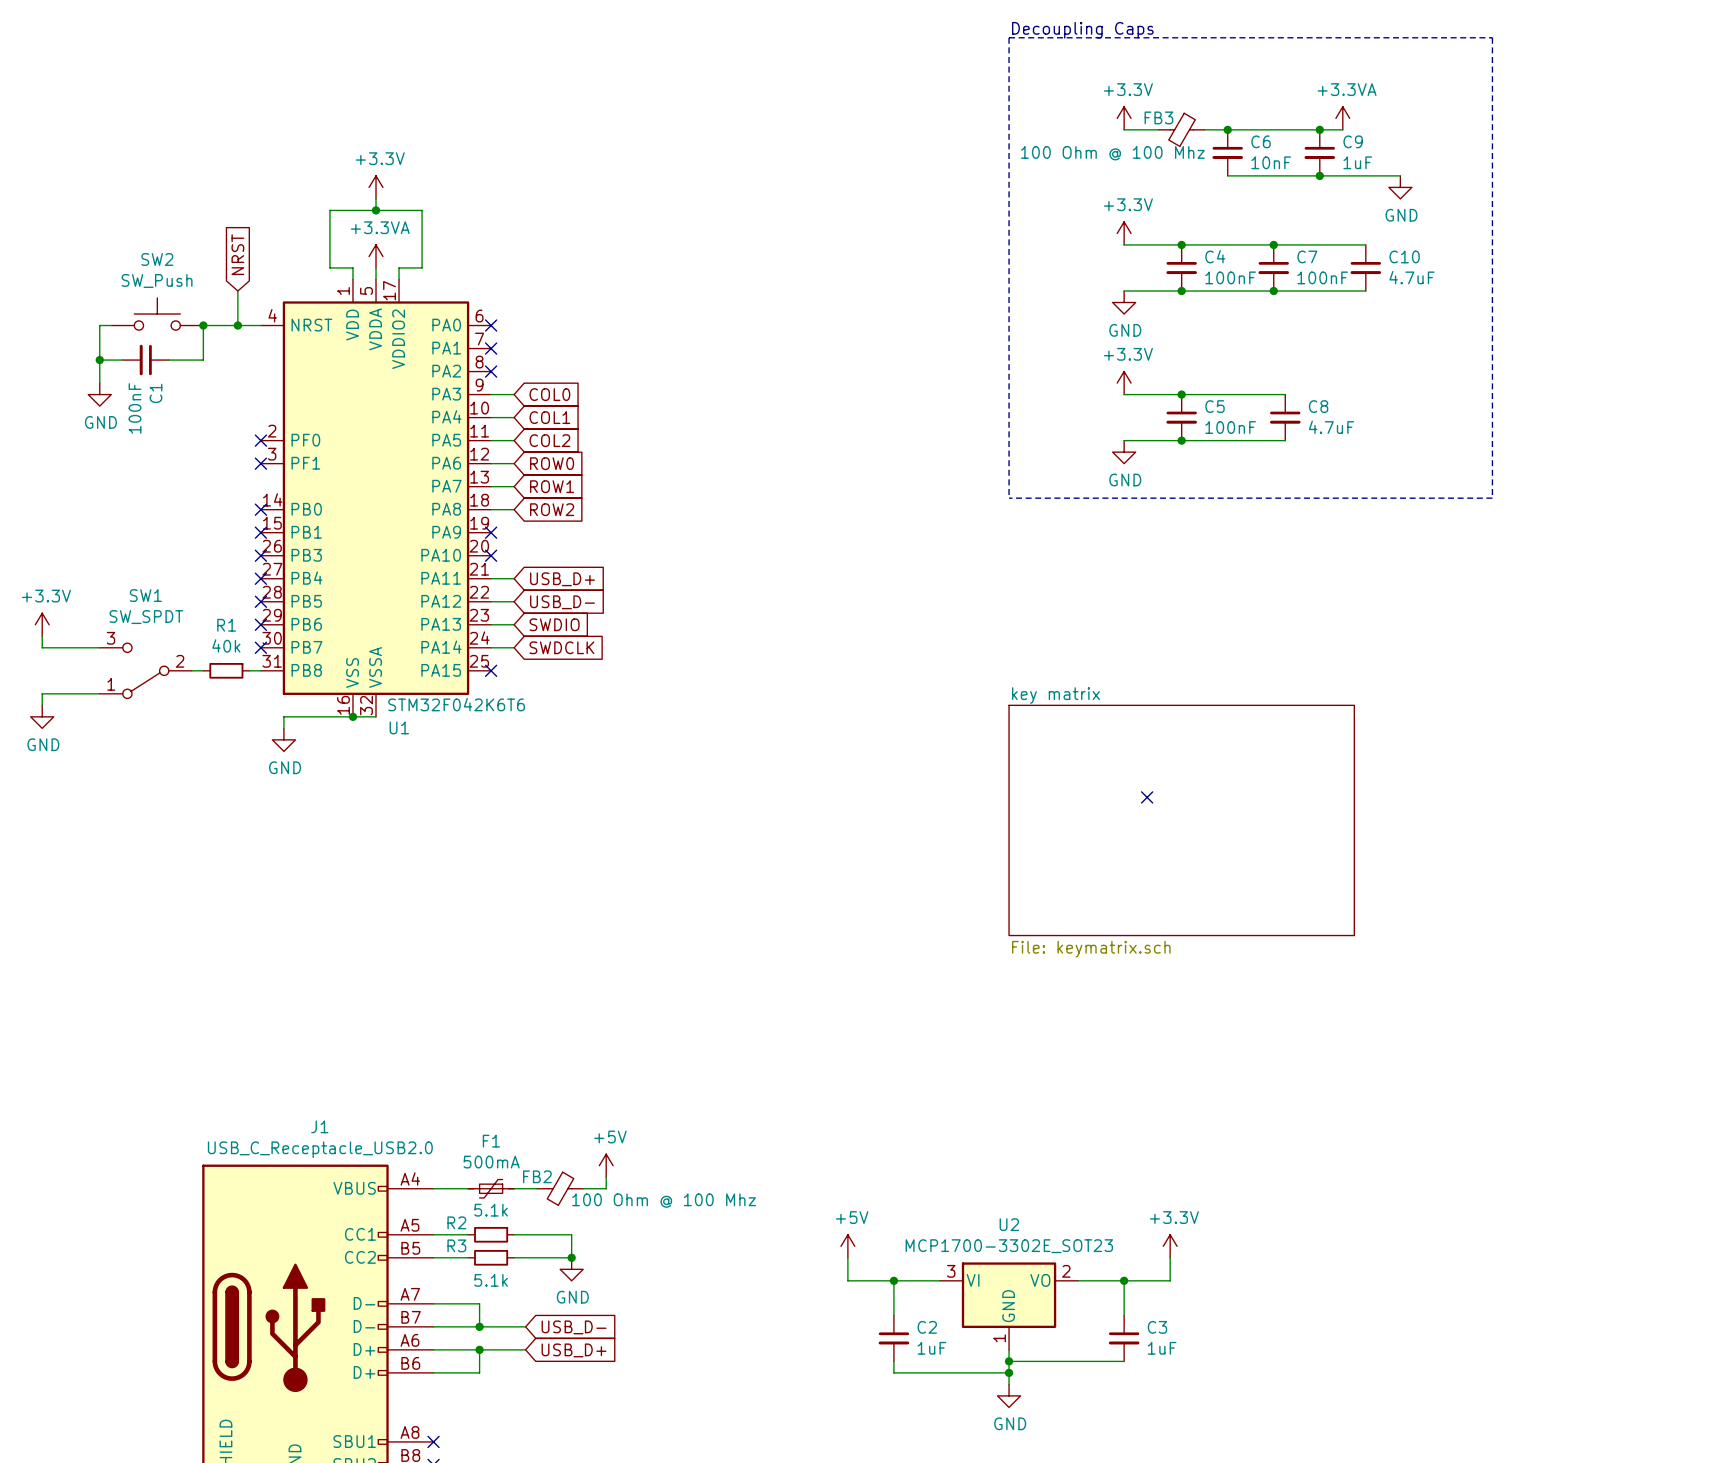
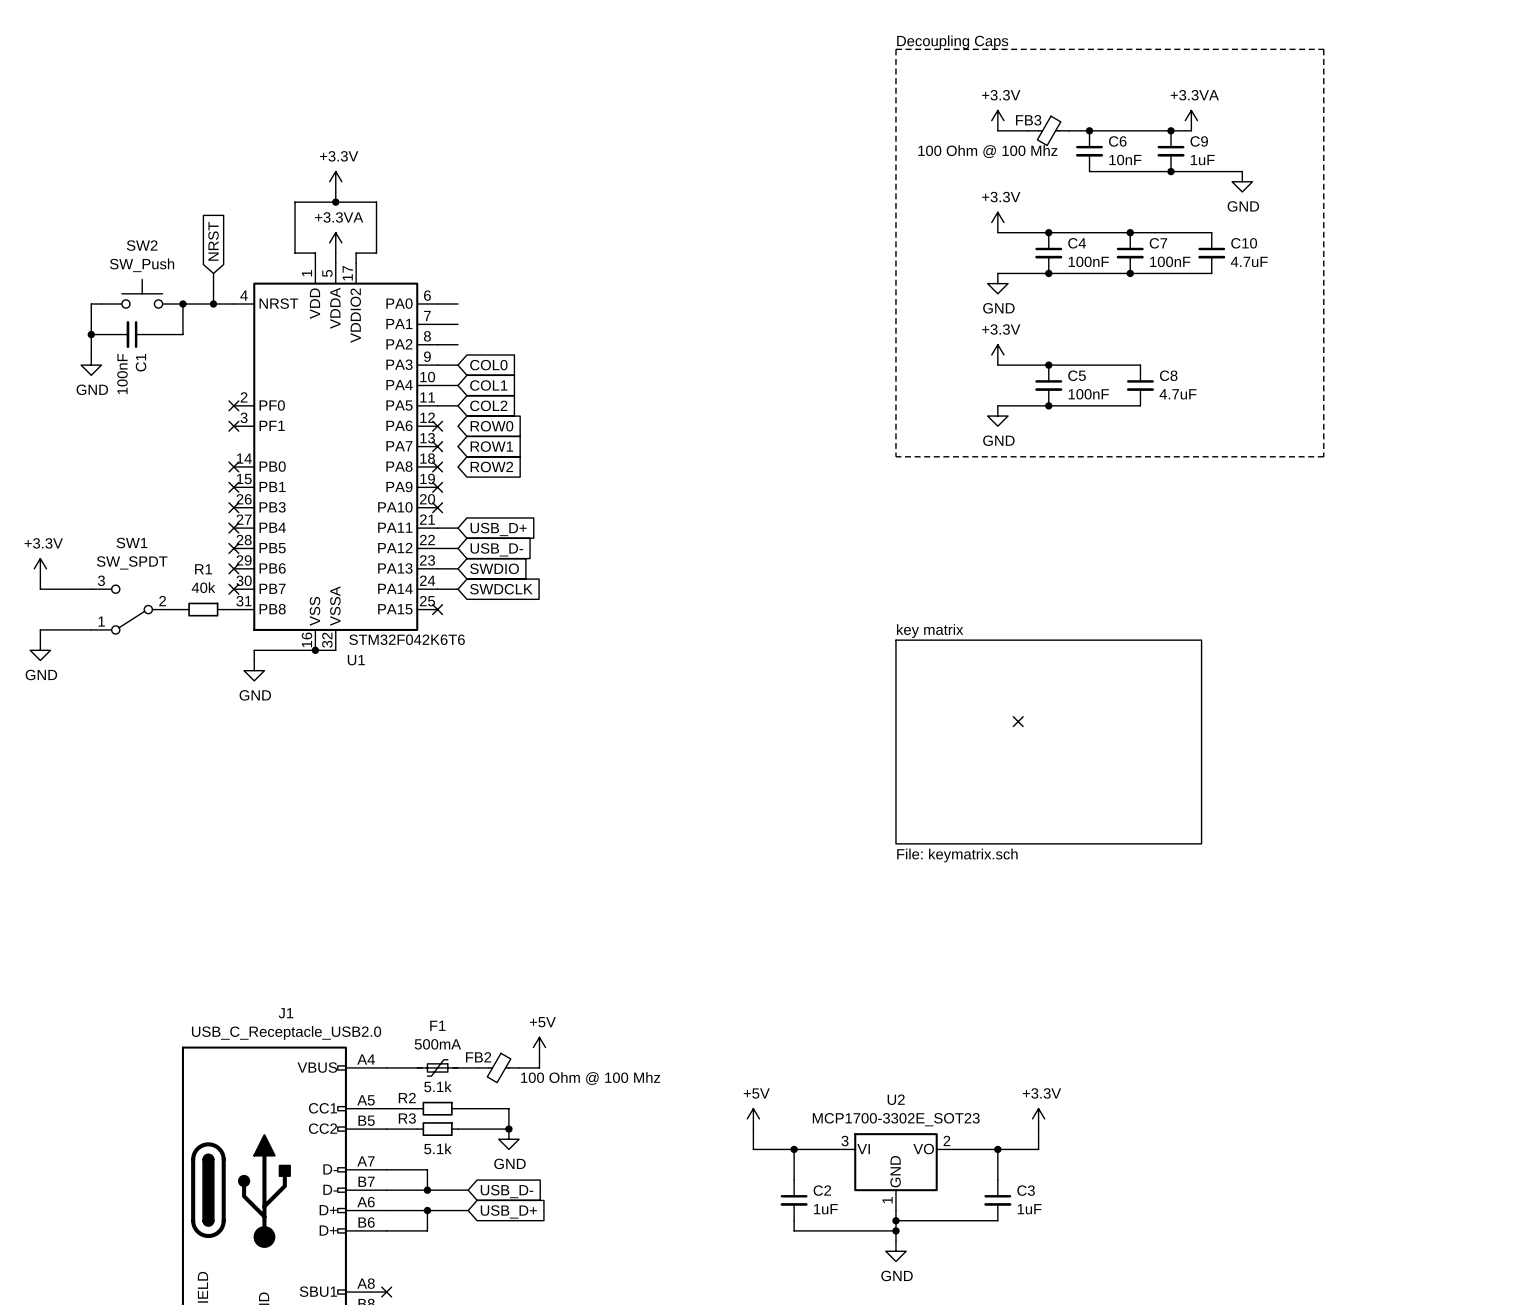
no-connect mark: (491, 325) -> none
no-connect mark: (491, 348) -> none
no-connect mark: (491, 371) -> none
wire: (491, 463) (514, 463) -> (437, 304) (457, 304)
no-connect mark: none -> (437, 426)
wire: (491, 486) (514, 486) -> (437, 324) (457, 324)
no-connect mark: none -> (437, 446)
wire: (491, 509) (514, 509) -> (437, 344) (457, 344)
no-connect mark: none -> (437, 466)

